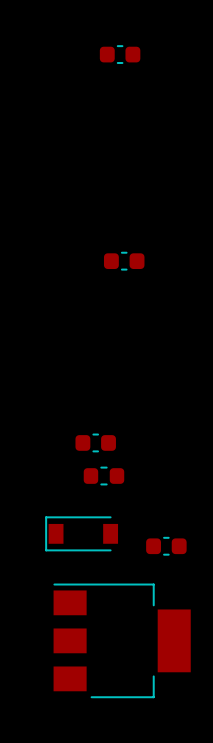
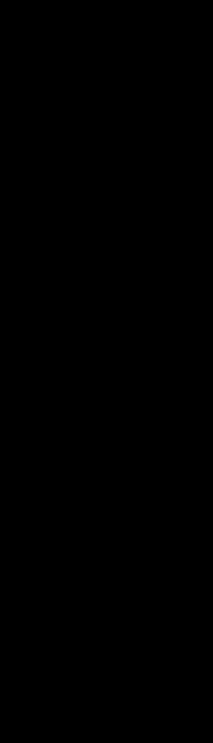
part: (120, 54) -> none
part: (124, 261) -> none
part: (95, 442) -> none
part: (103, 476) -> none
part: (81, 533) -> none
part: (166, 546) -> none
part: (122, 640) -> none

